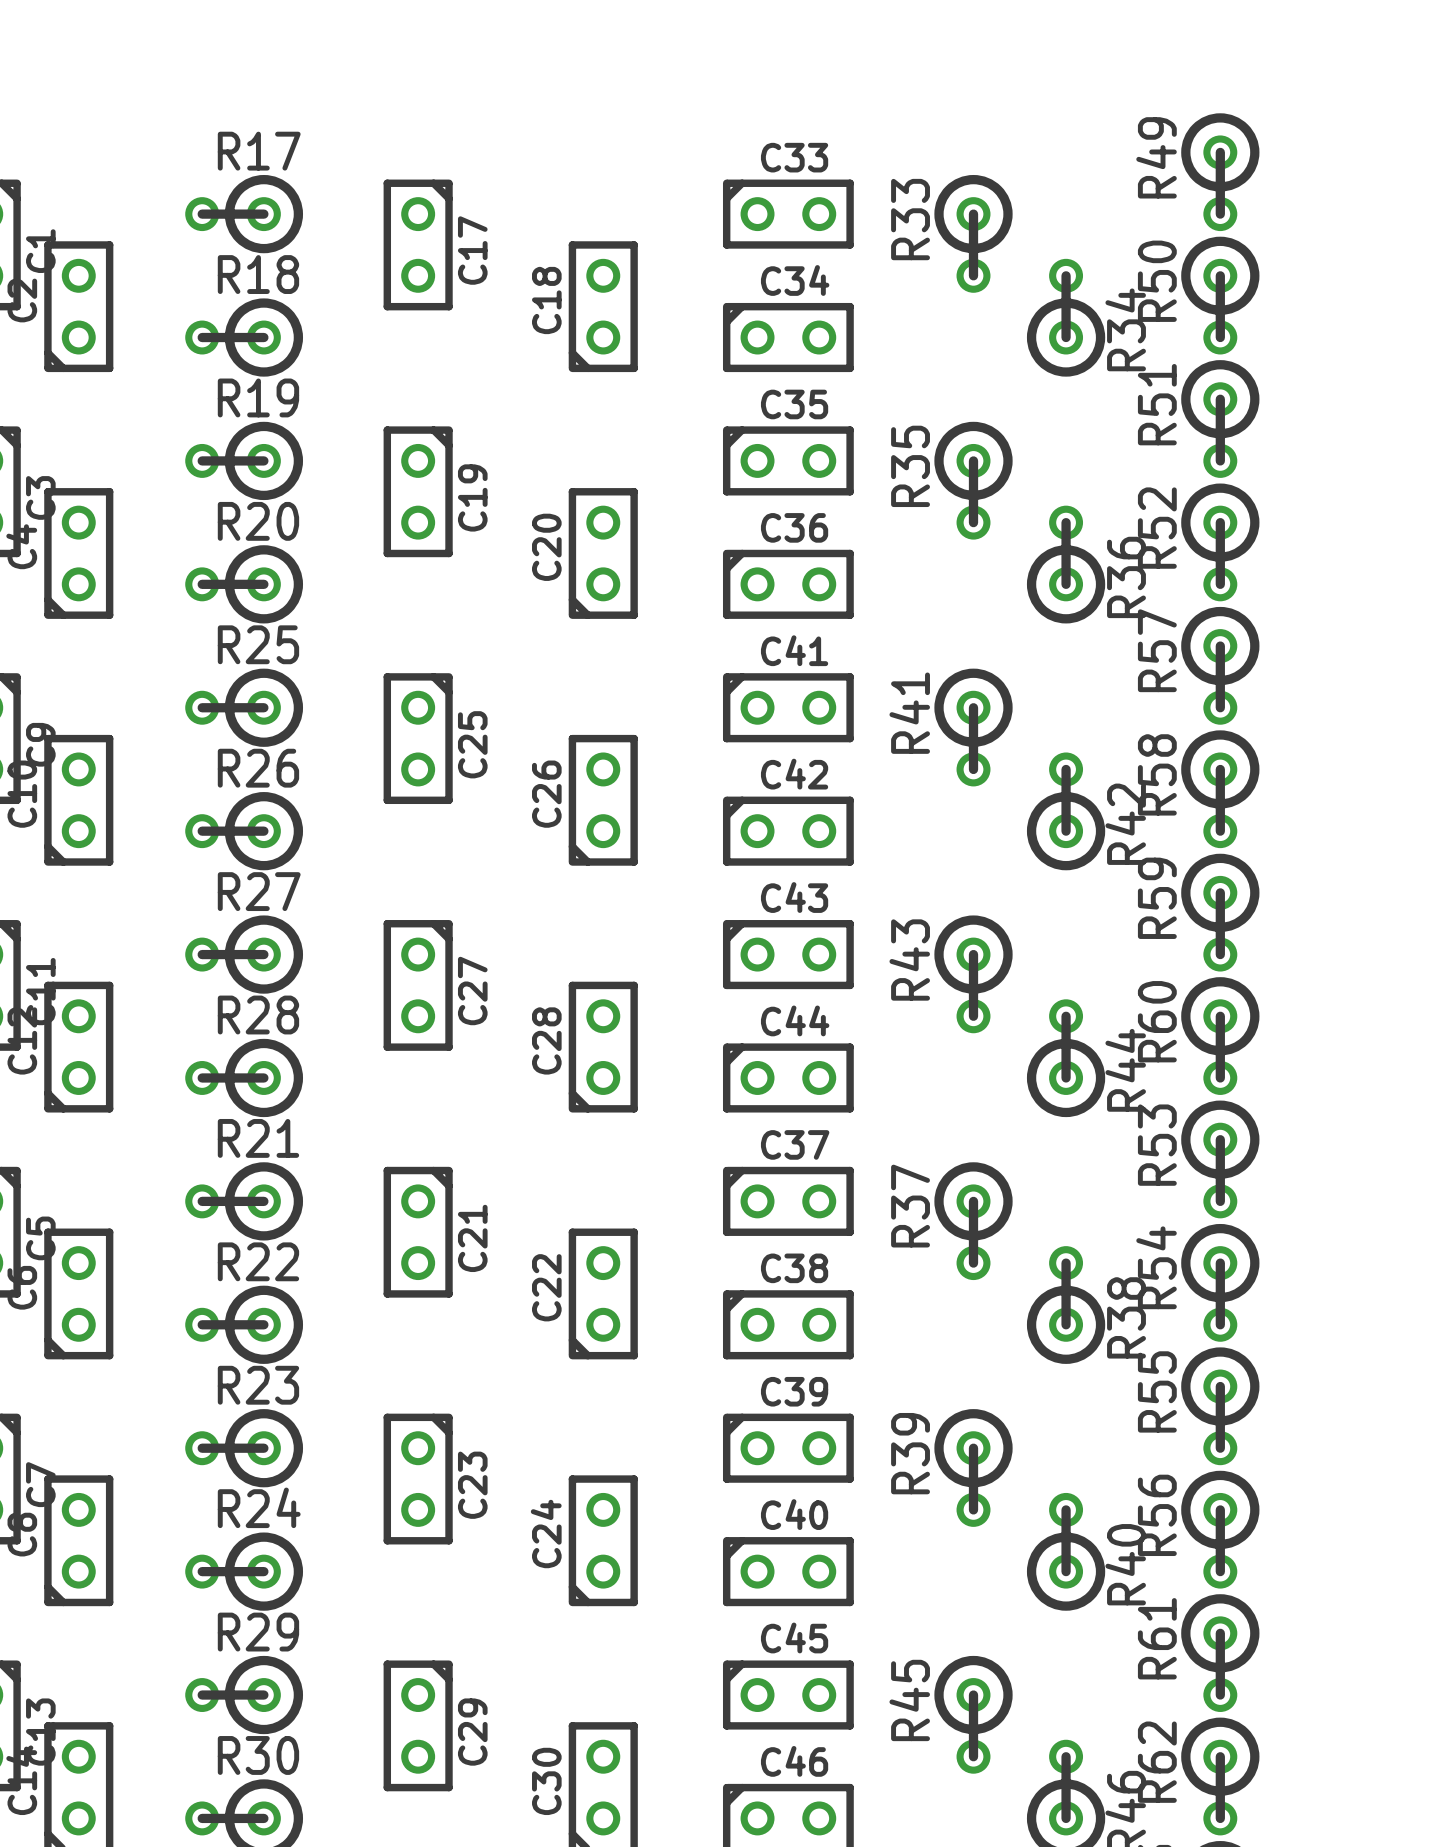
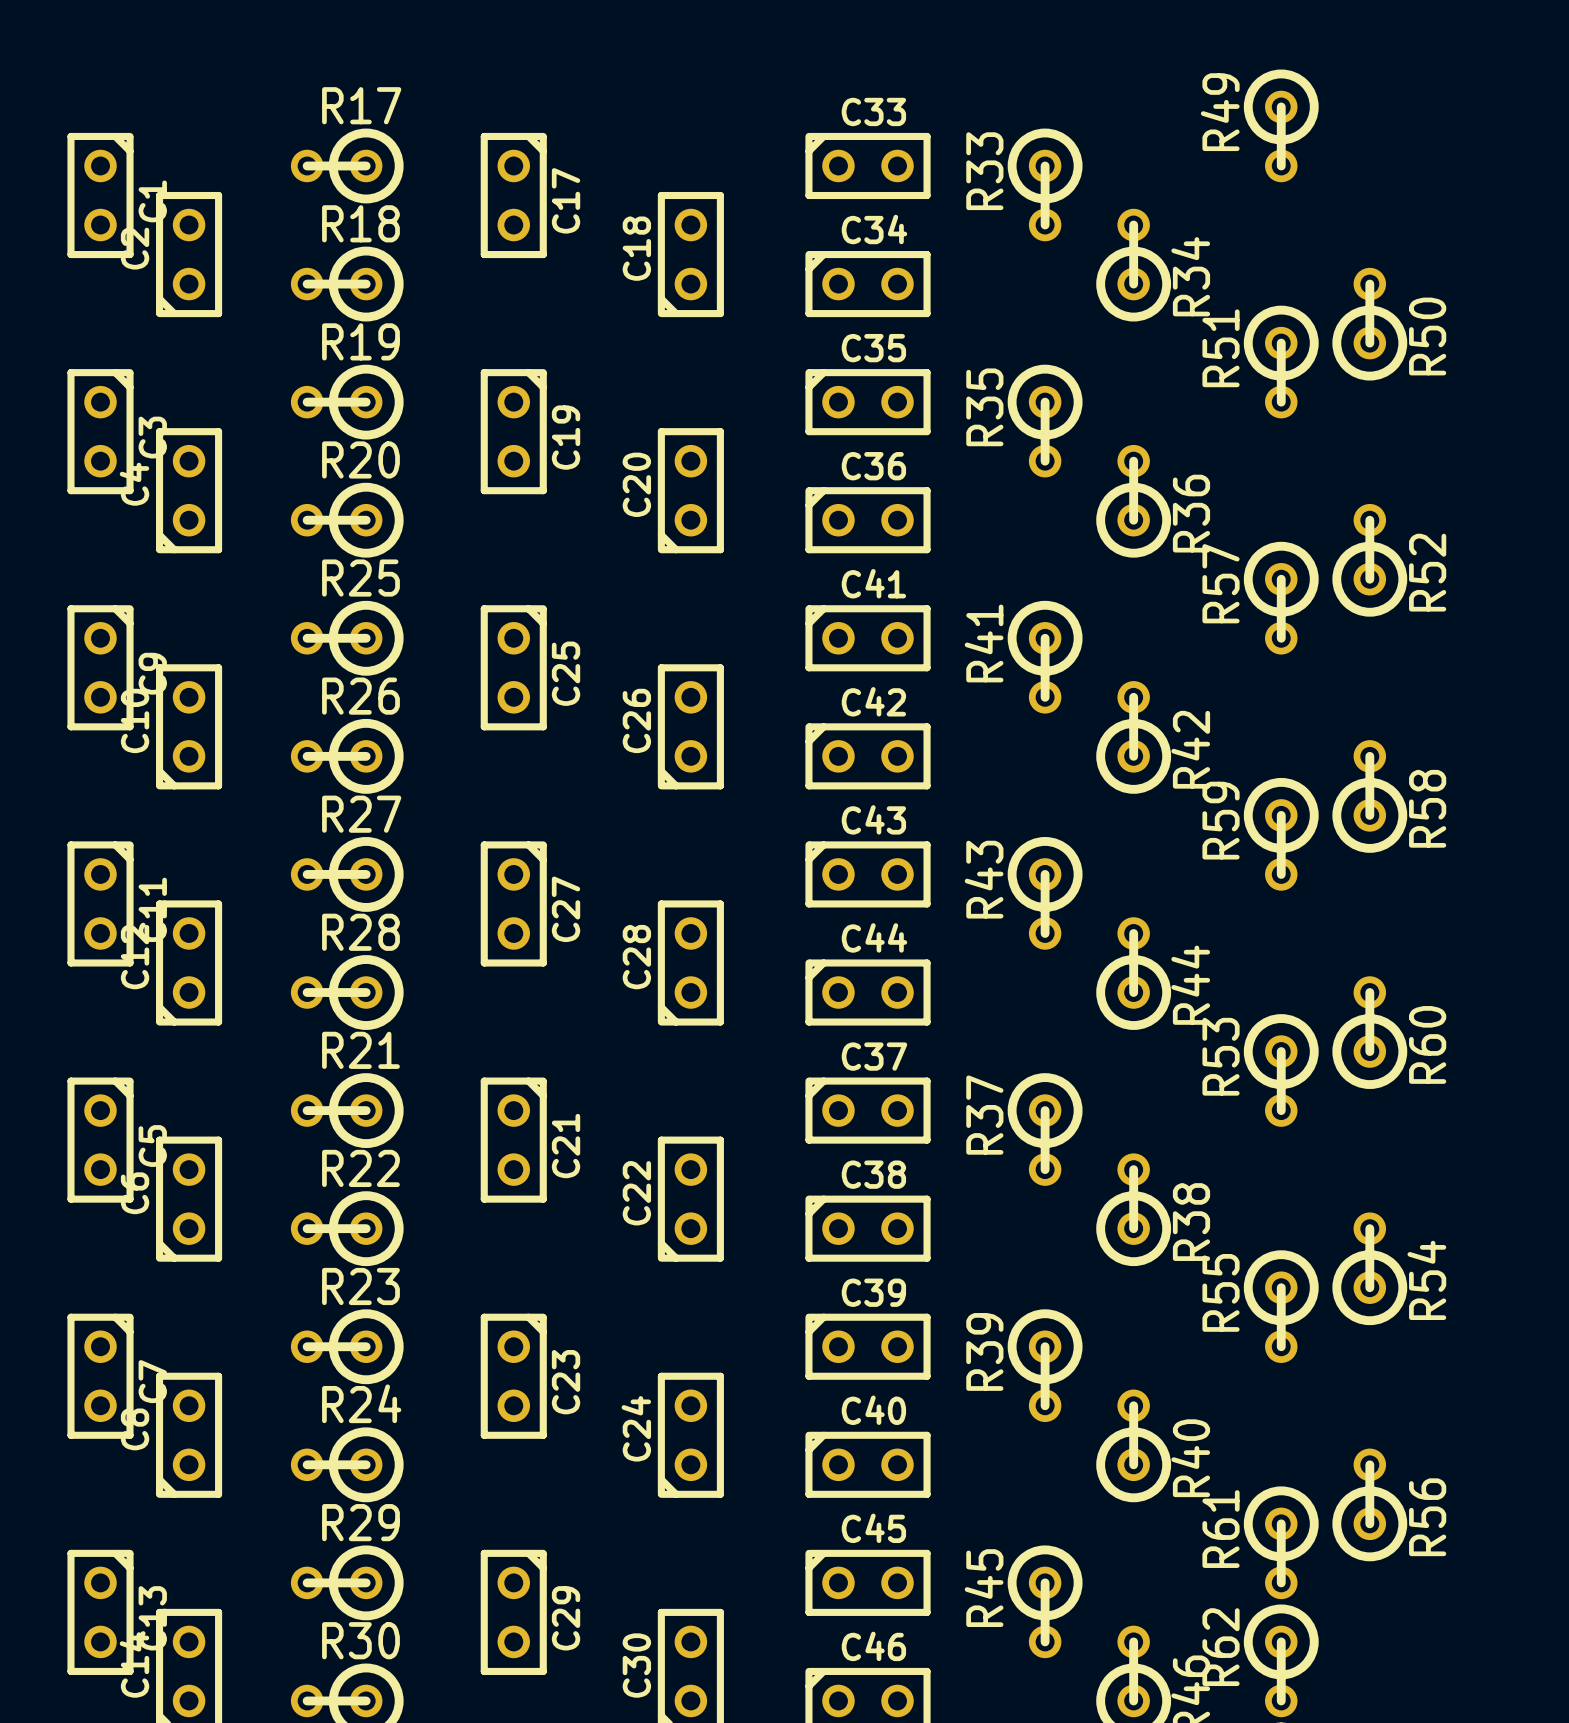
R50 rotation: 0° (1220, 295) -> 180° (1369, 324)
R50 position: (1220, 295) -> (1369, 324)
R52 rotation: 0° (1220, 542) -> 180° (1369, 560)
R52 position: (1220, 542) -> (1369, 560)
R58 rotation: 0° (1220, 789) -> 180° (1369, 796)
R58 position: (1220, 789) -> (1369, 796)
R60 rotation: 0° (1220, 1036) -> 180° (1369, 1032)
R60 position: (1220, 1036) -> (1369, 1032)
R54 rotation: 0° (1220, 1282) -> 180° (1369, 1268)
R54 position: (1220, 1282) -> (1369, 1268)
R56 rotation: 0° (1220, 1529) -> 180° (1369, 1504)
R56 position: (1220, 1529) -> (1369, 1504)

